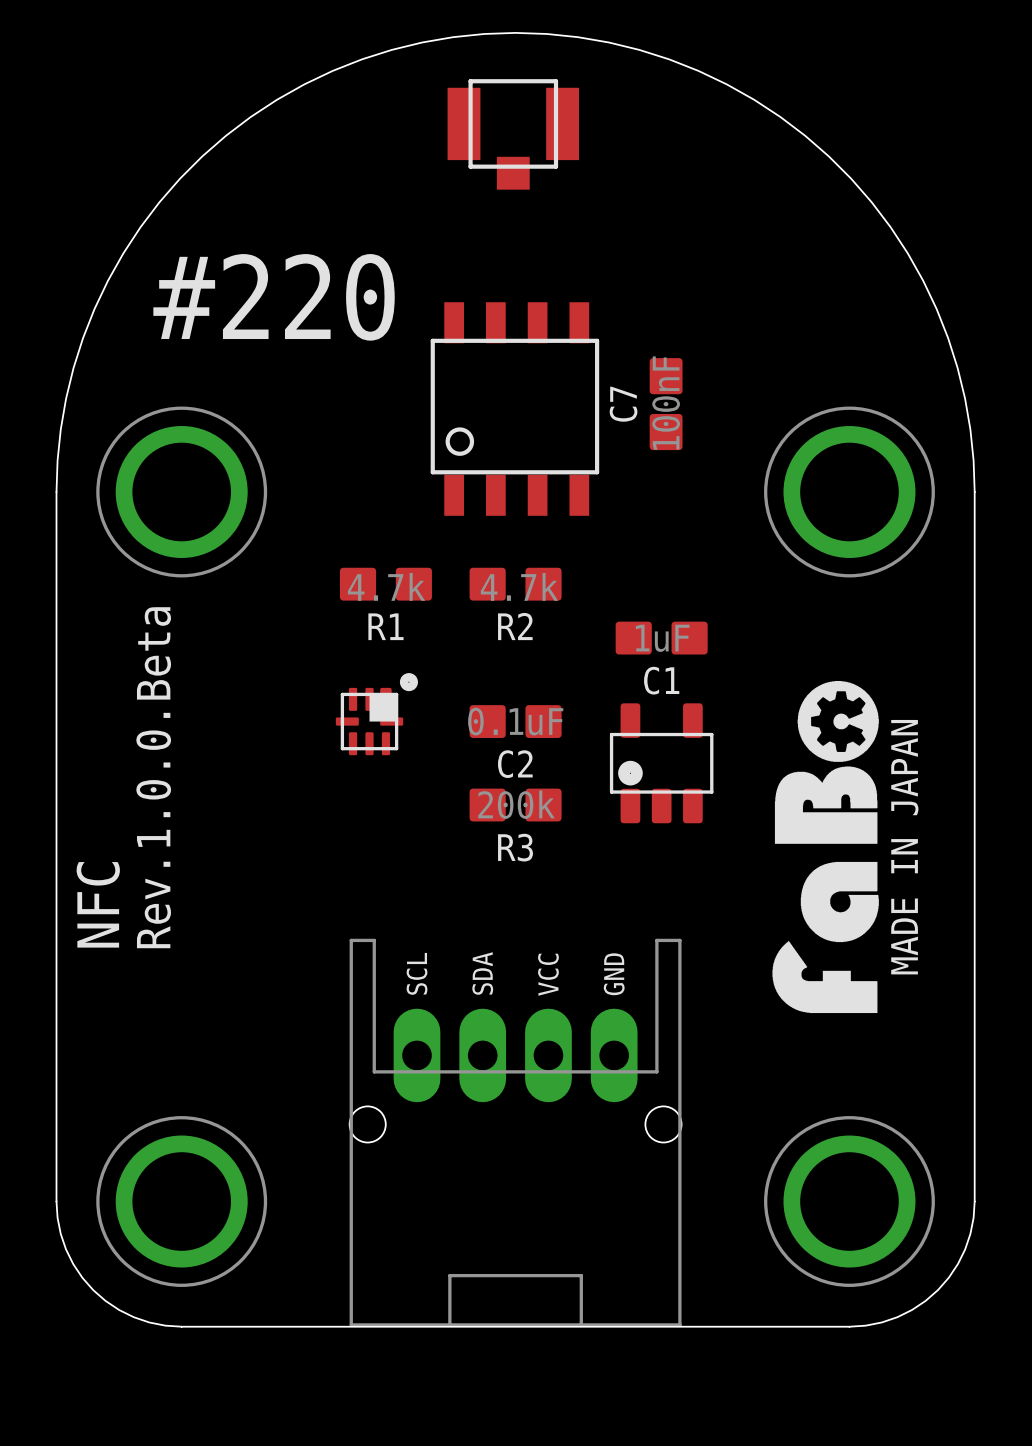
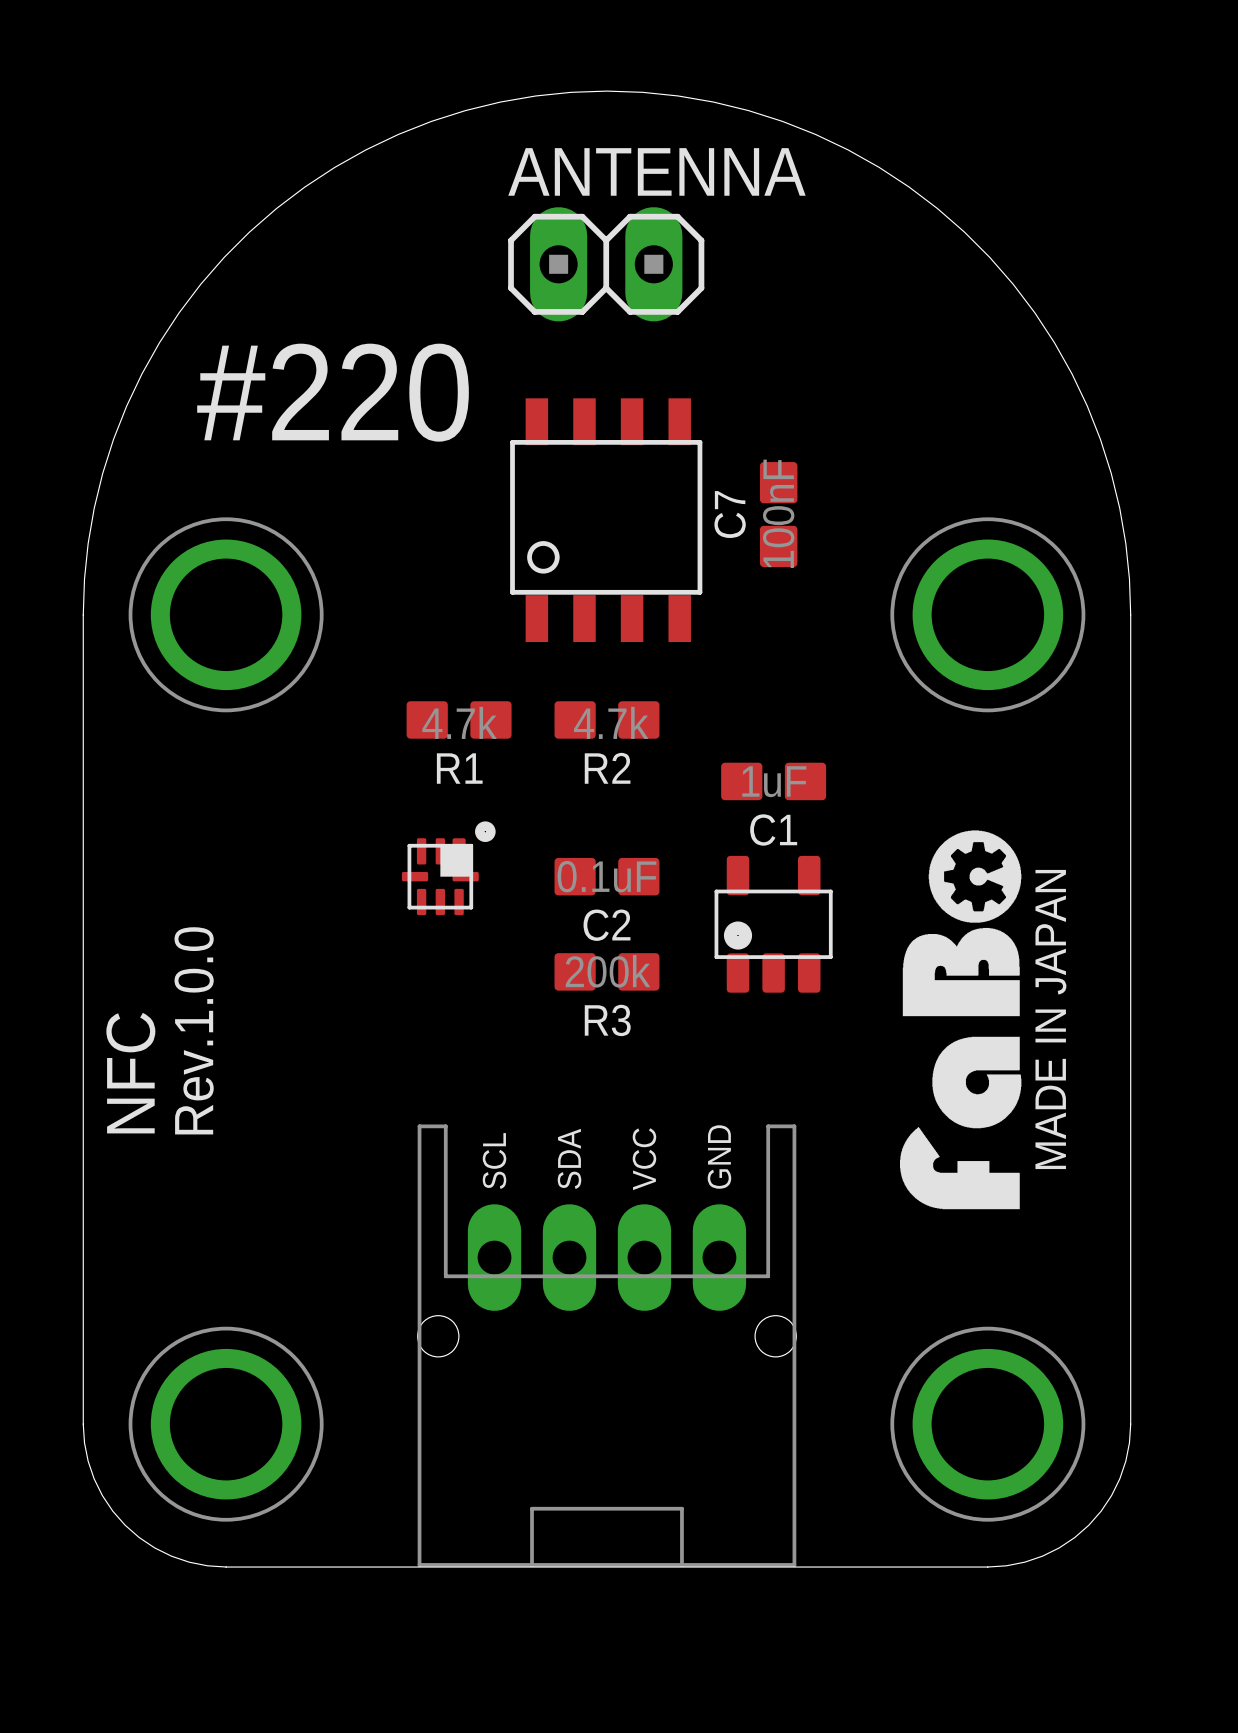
part: (513, 134) -> none
ANTENNA: none -> (606, 264)
text: Rev.1.0.0.Beta (153, 777) -> Rev.1.0.0 (194, 1030)

